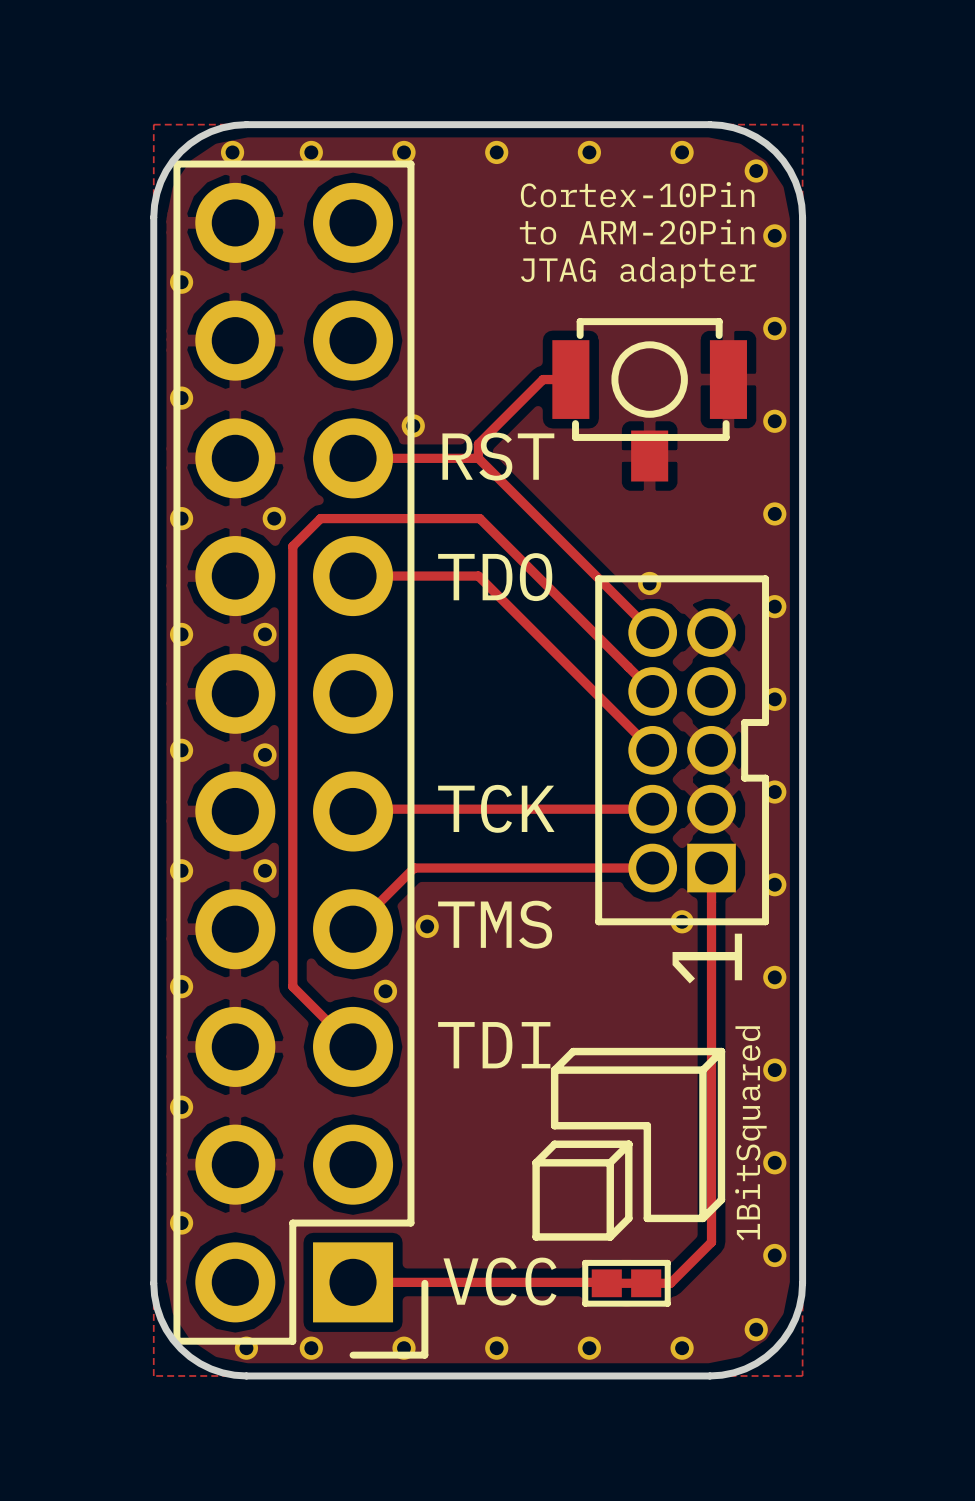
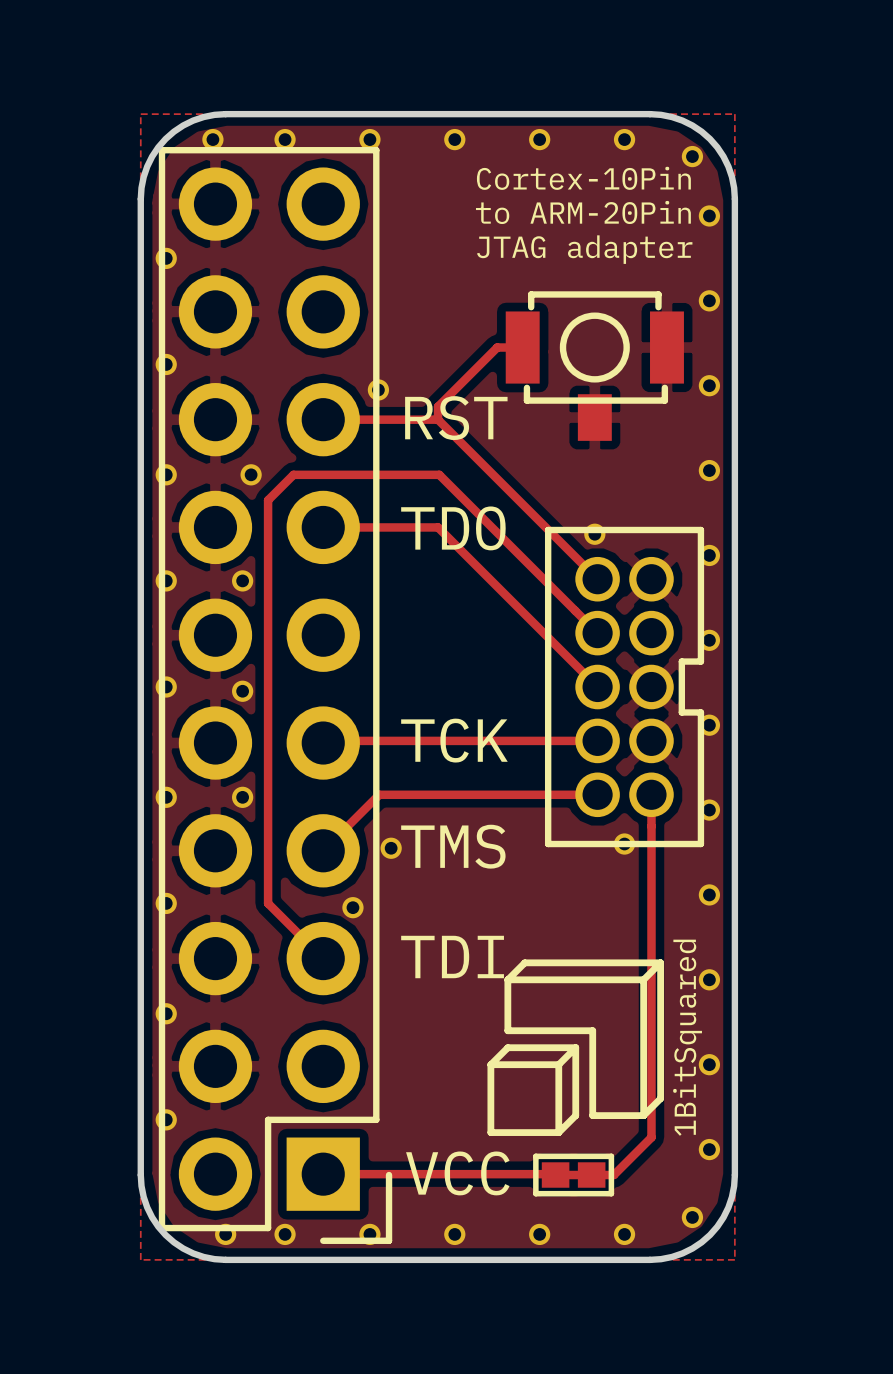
part footprint: [595, 575, 770, 926] -> [544, 526, 705, 848]
text: 1 (707, 958) -> none

